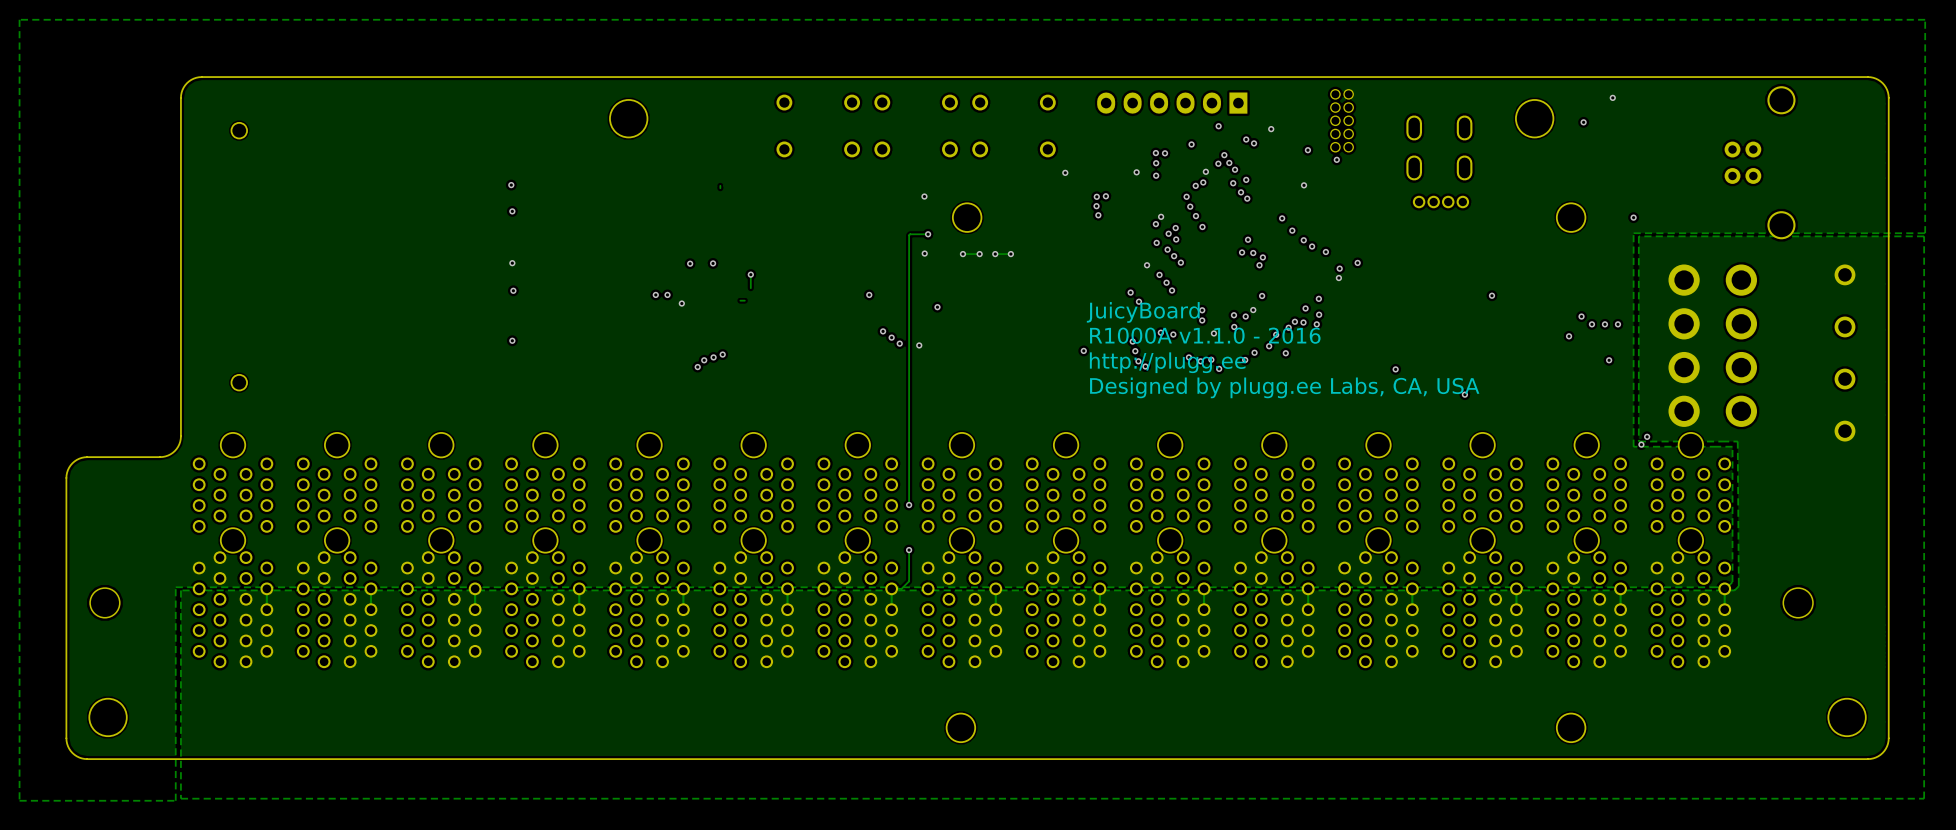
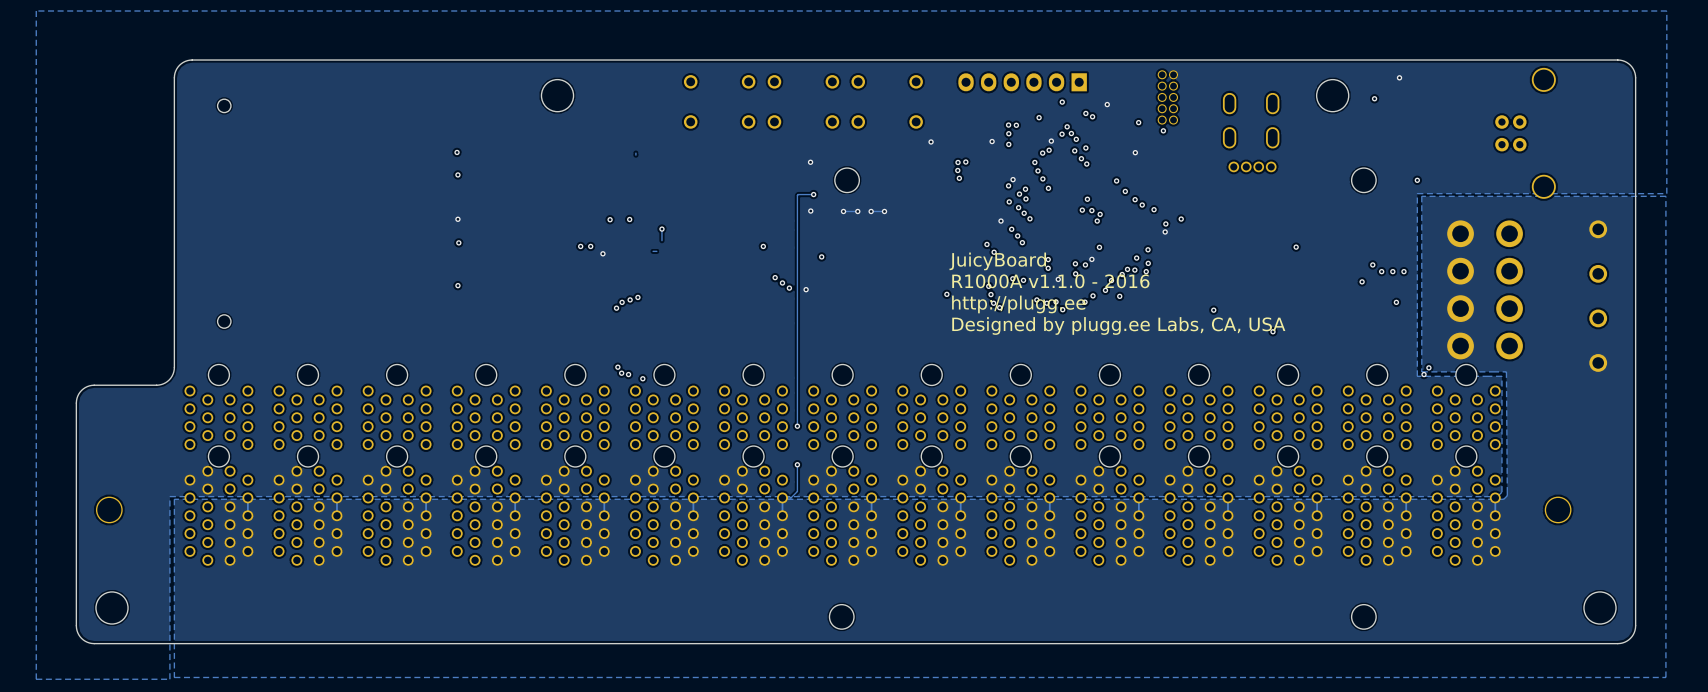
via: none -> (617, 367)
via: none -> (621, 373)
via: none -> (628, 374)
via: none -> (642, 378)

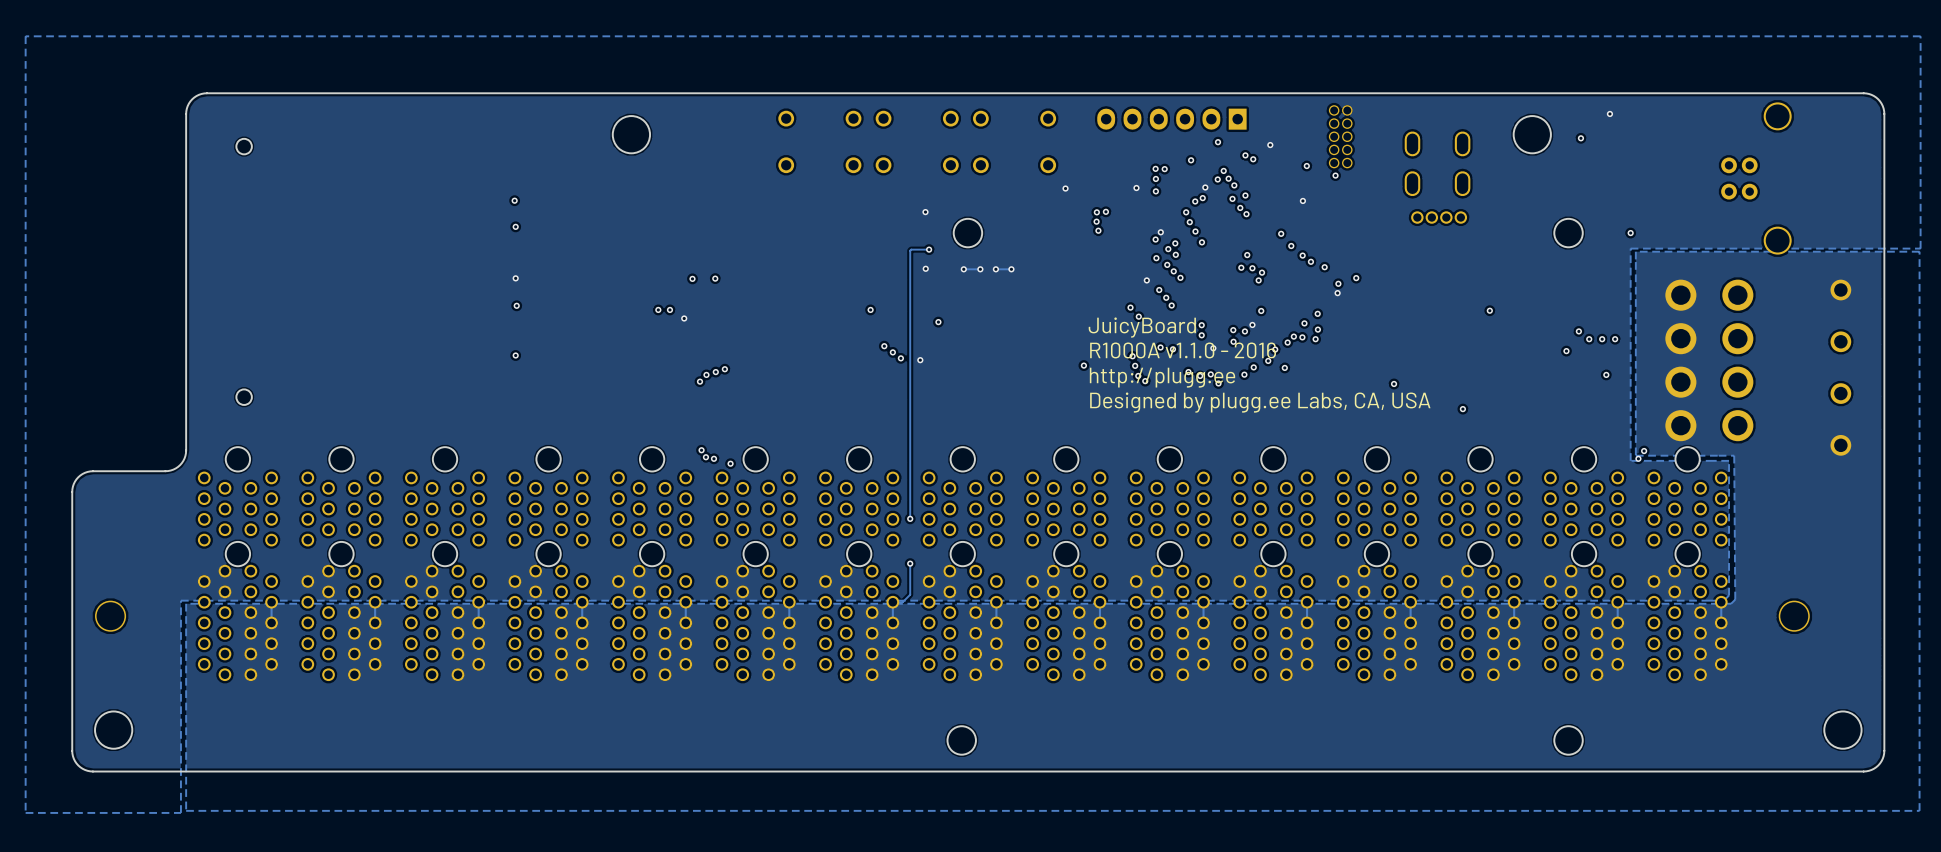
track: (635, 153) (635, 155) -> none
track: (661, 229) (661, 240) -> none
via: (661, 229) -> none
track: (656, 251) (653, 251) -> none

